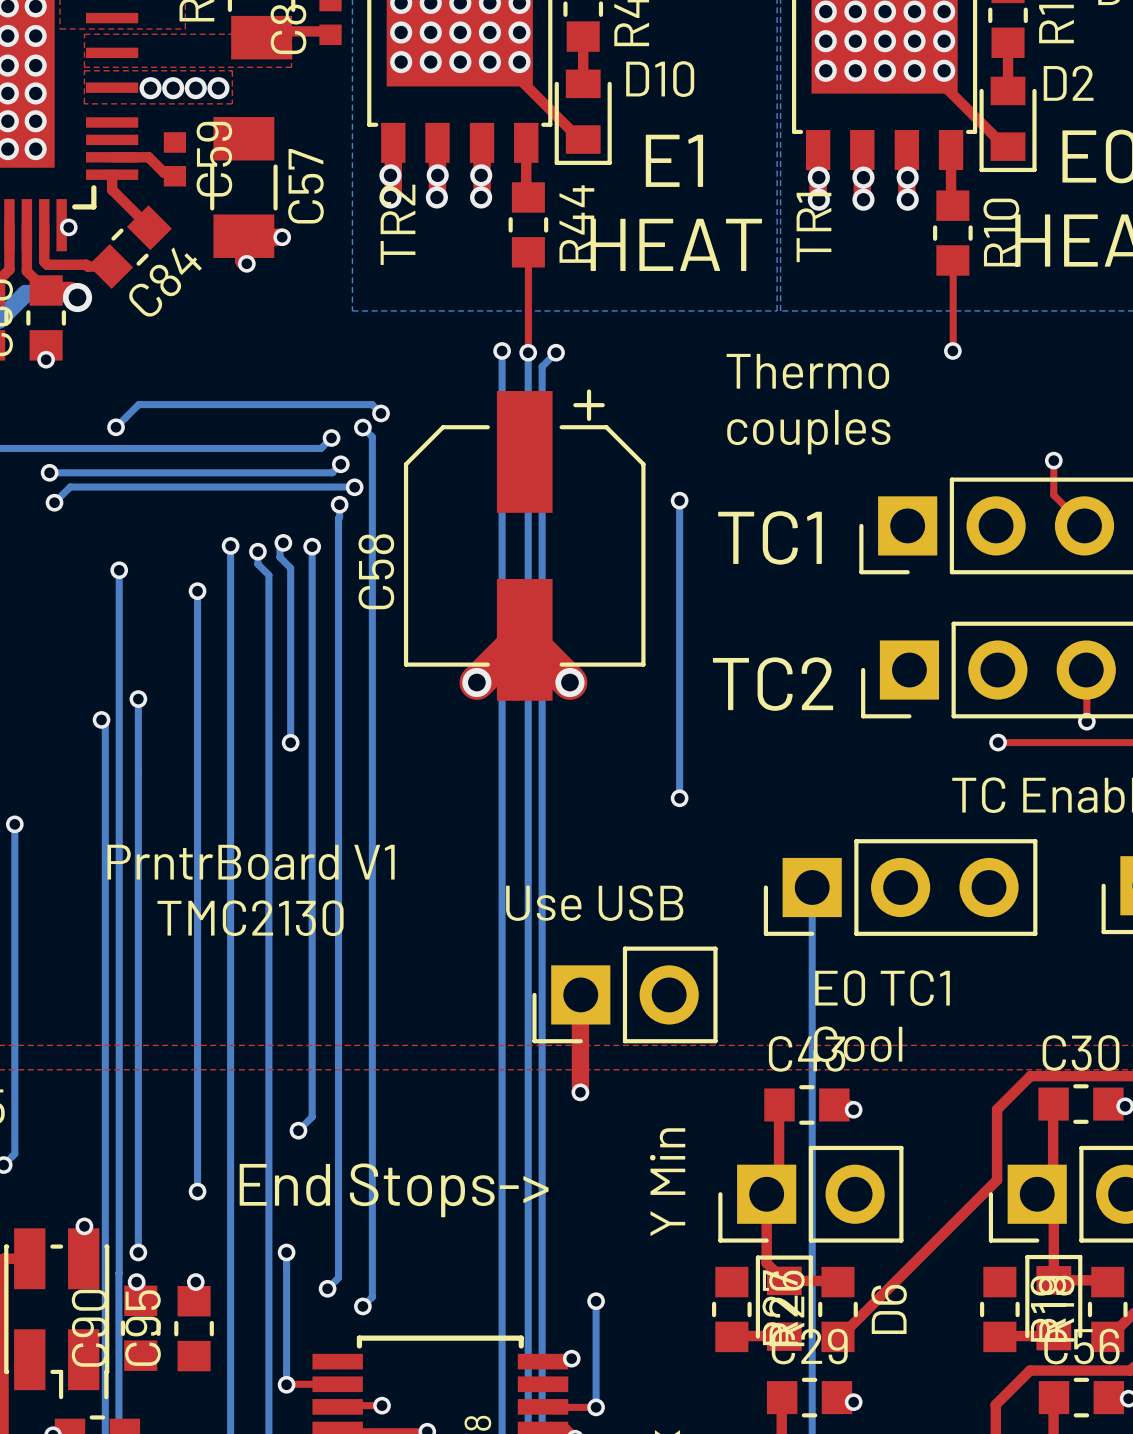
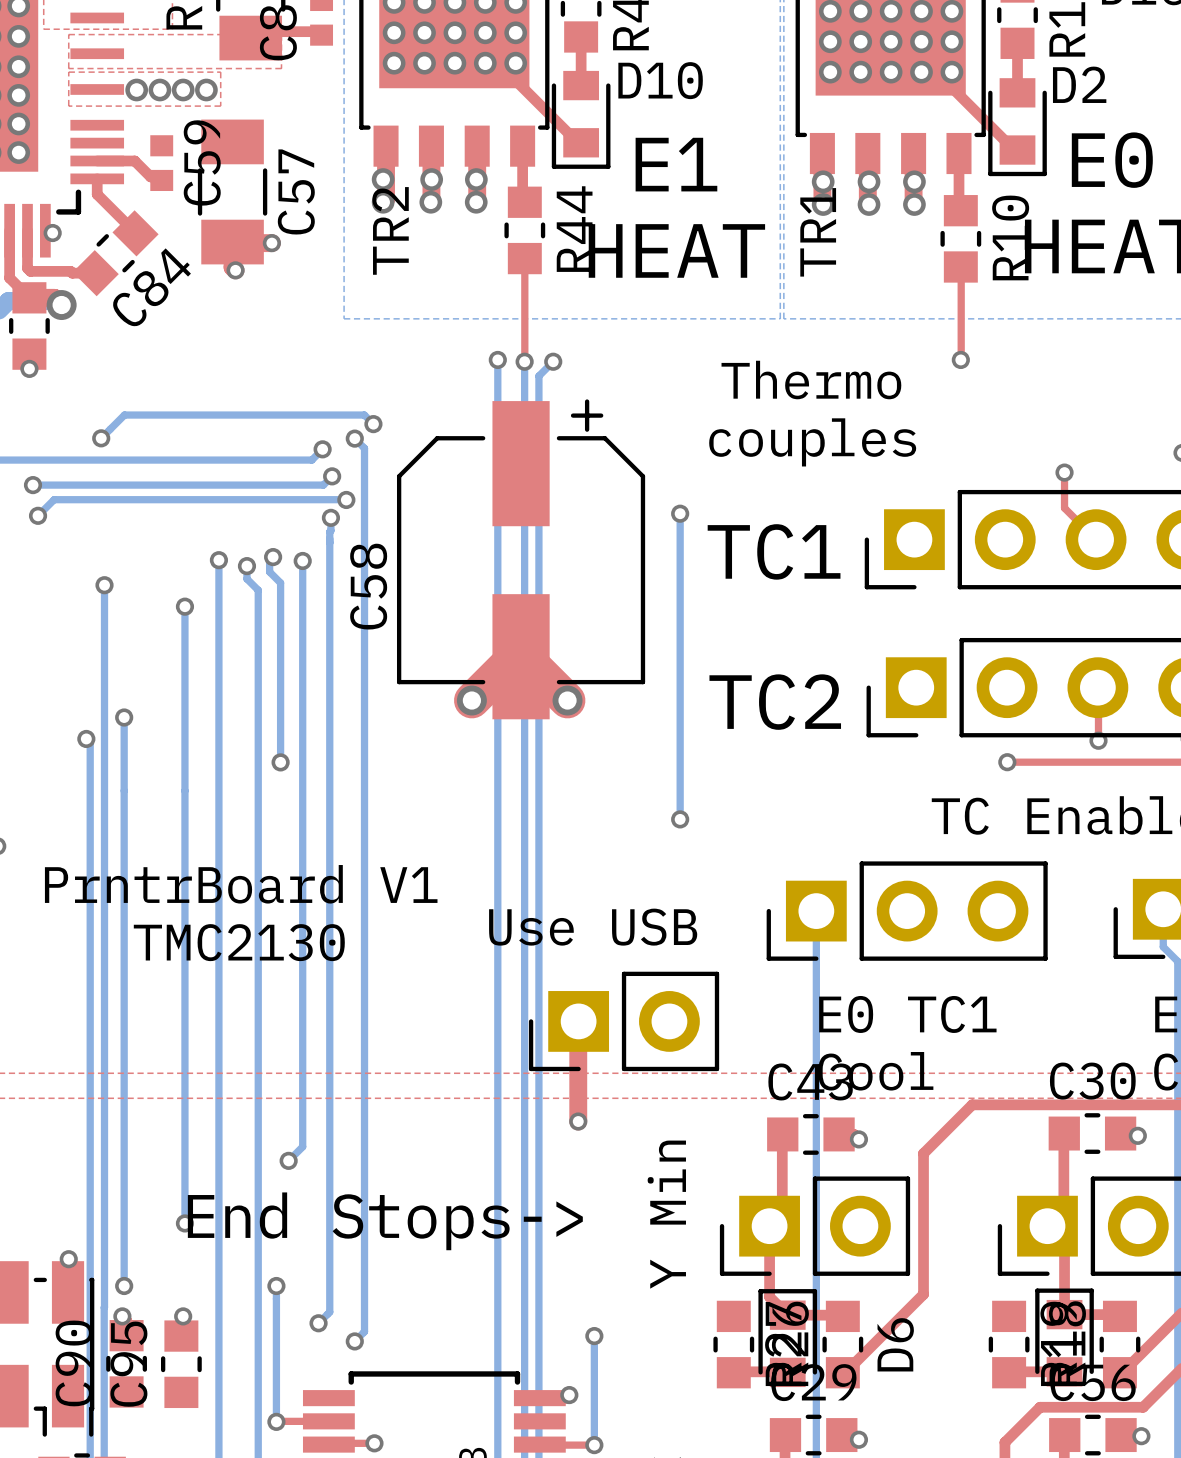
top track: (1030, 1076) (997, 1109) (997, 1180) (916, 1260) -> (1040, 1104) (972, 1104) (923, 1153) (923, 1294)

